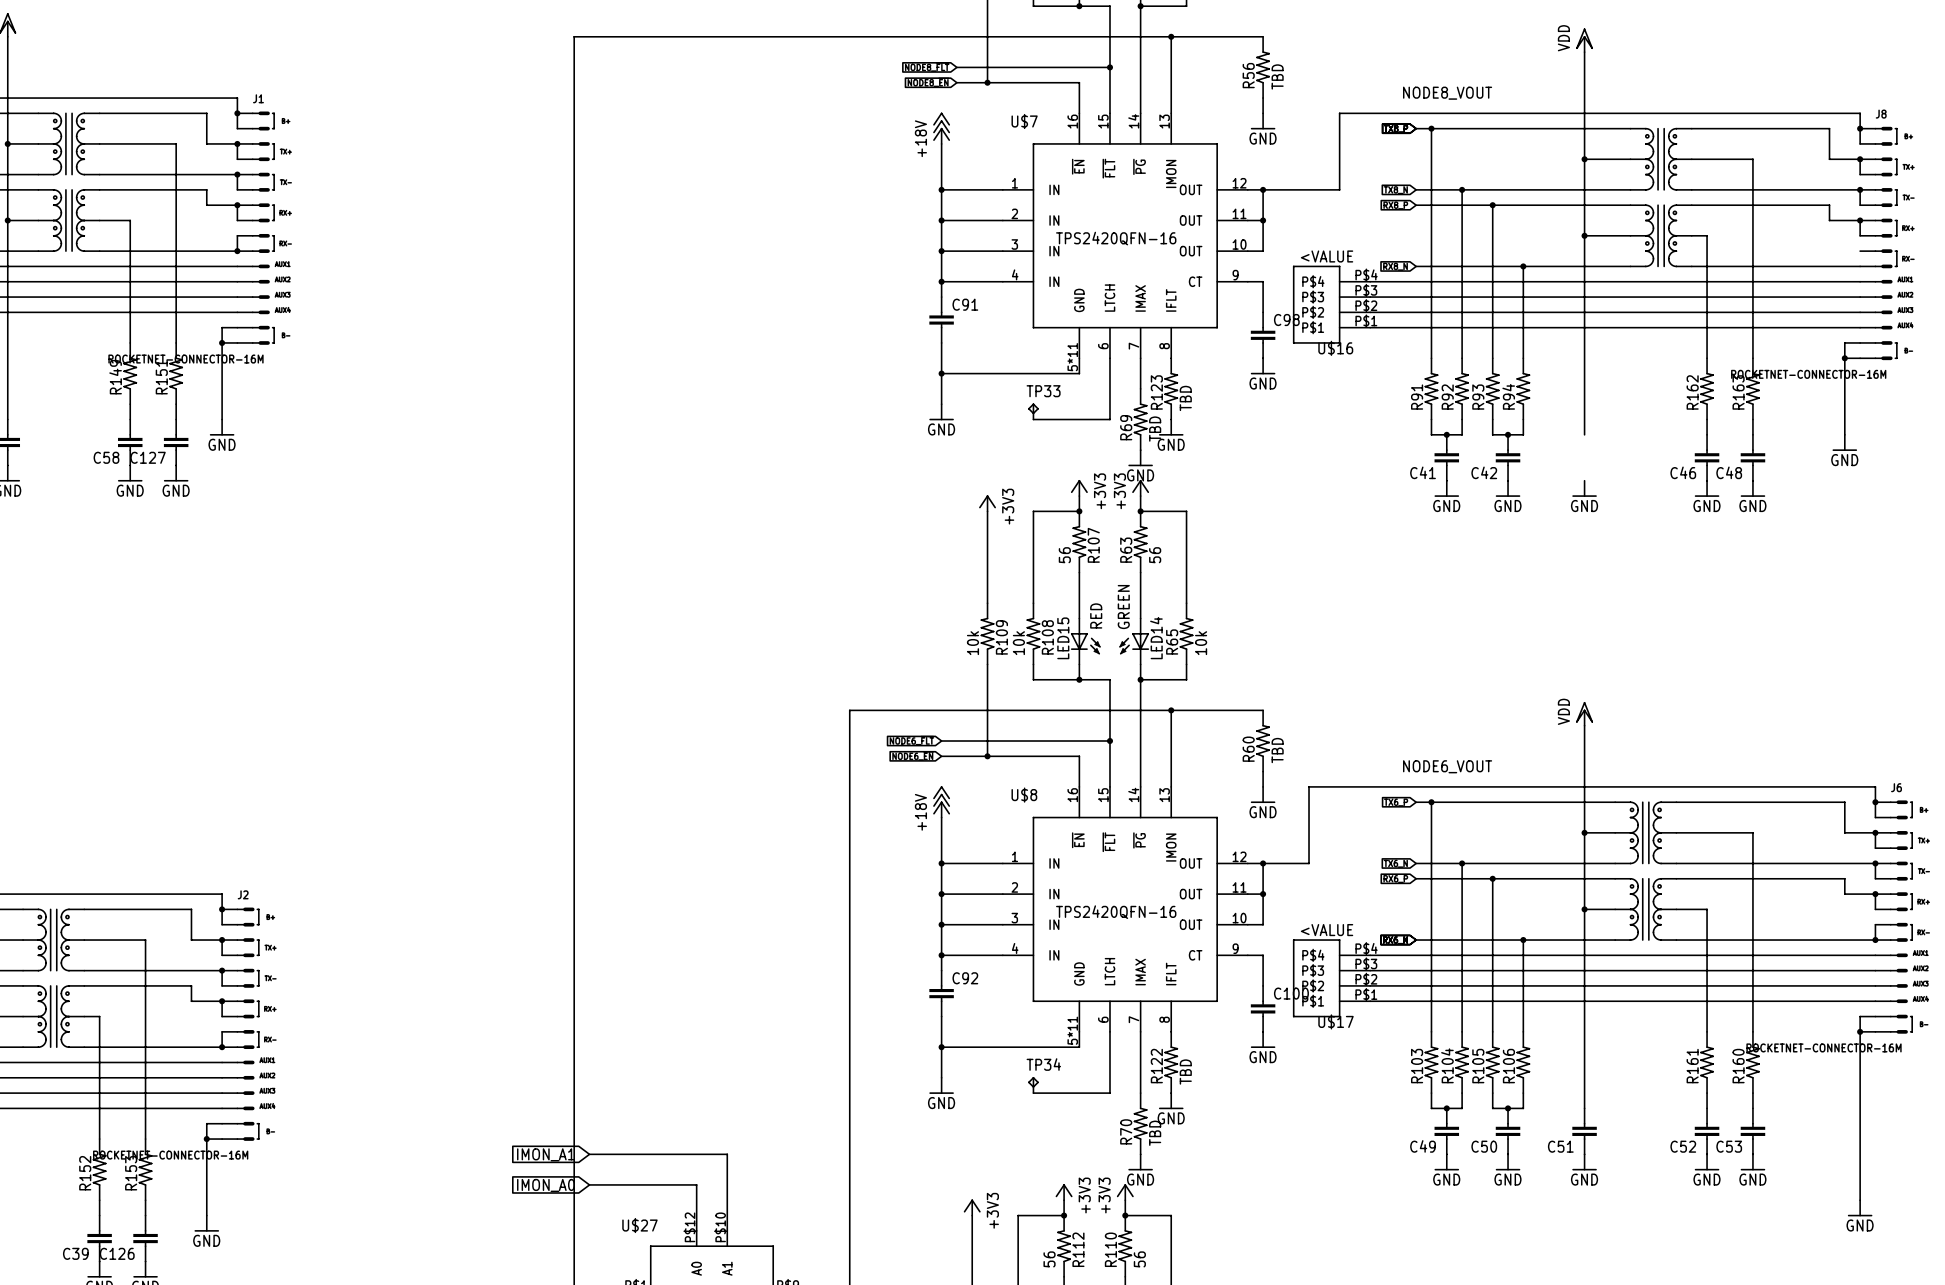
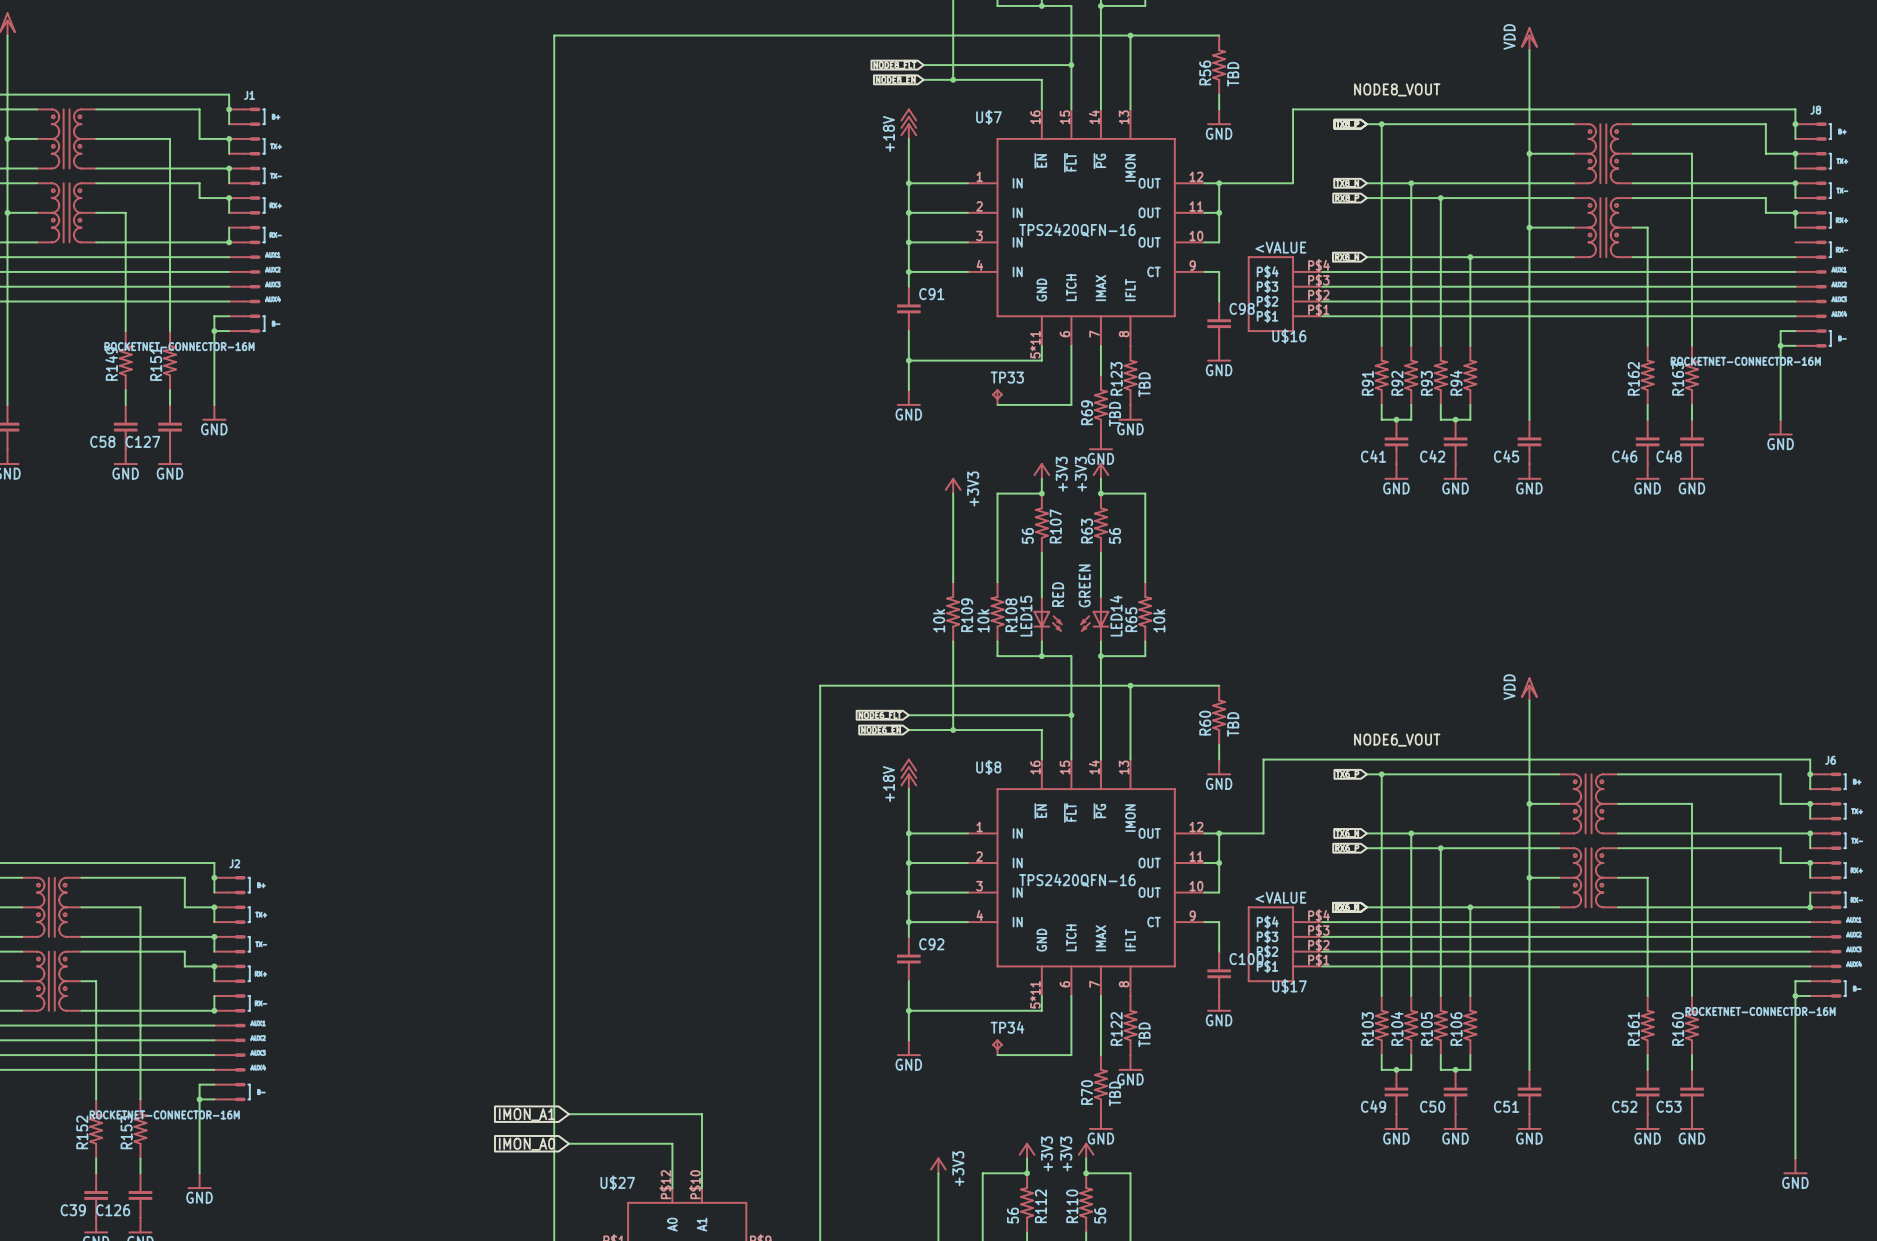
C45: none -> (1529, 441)

